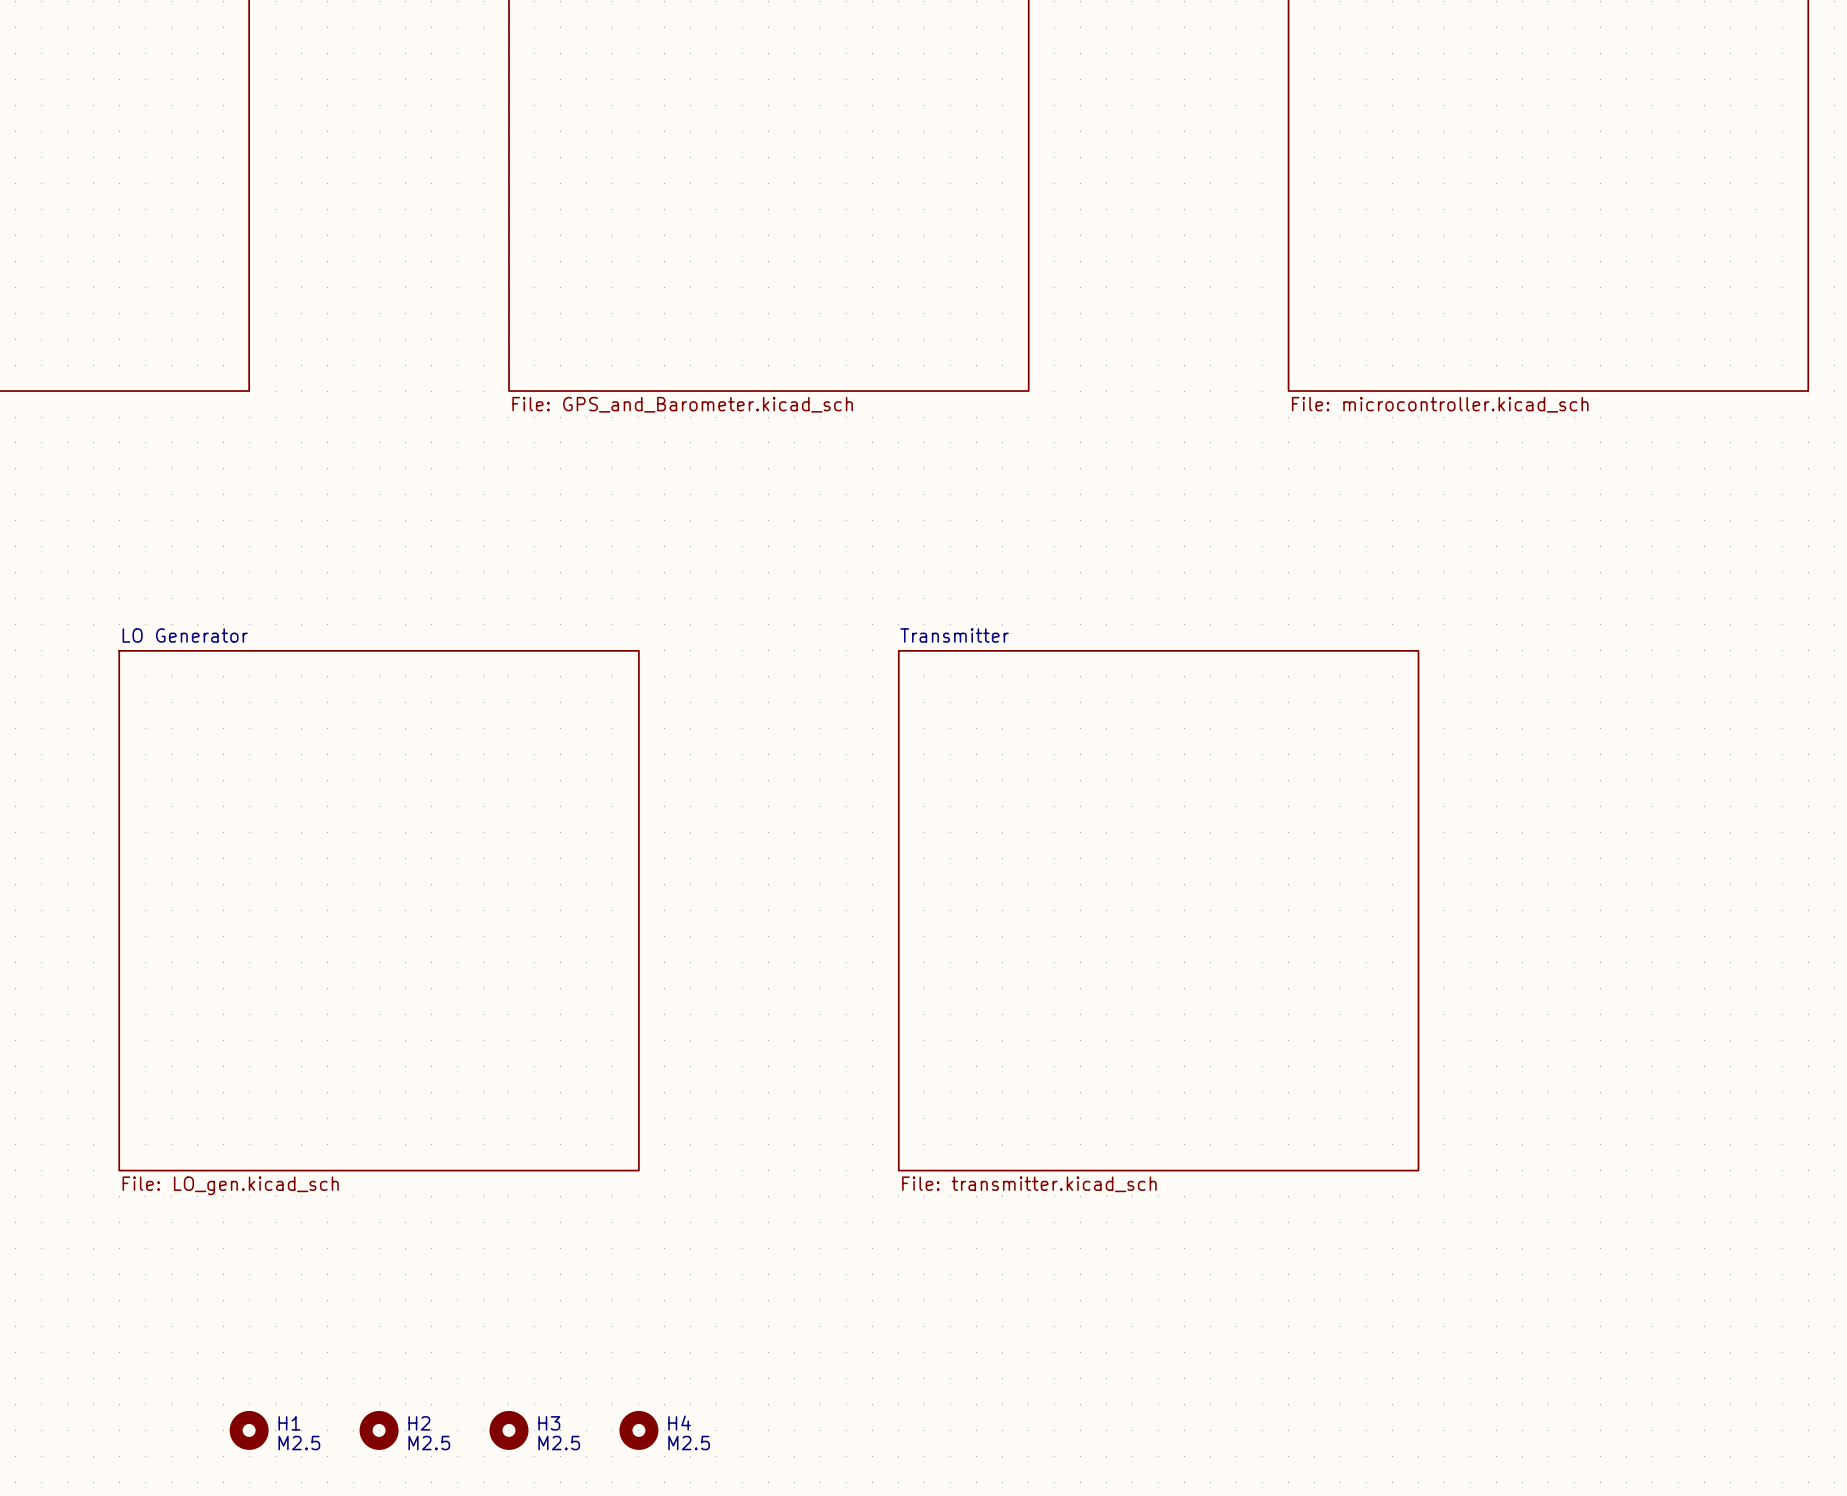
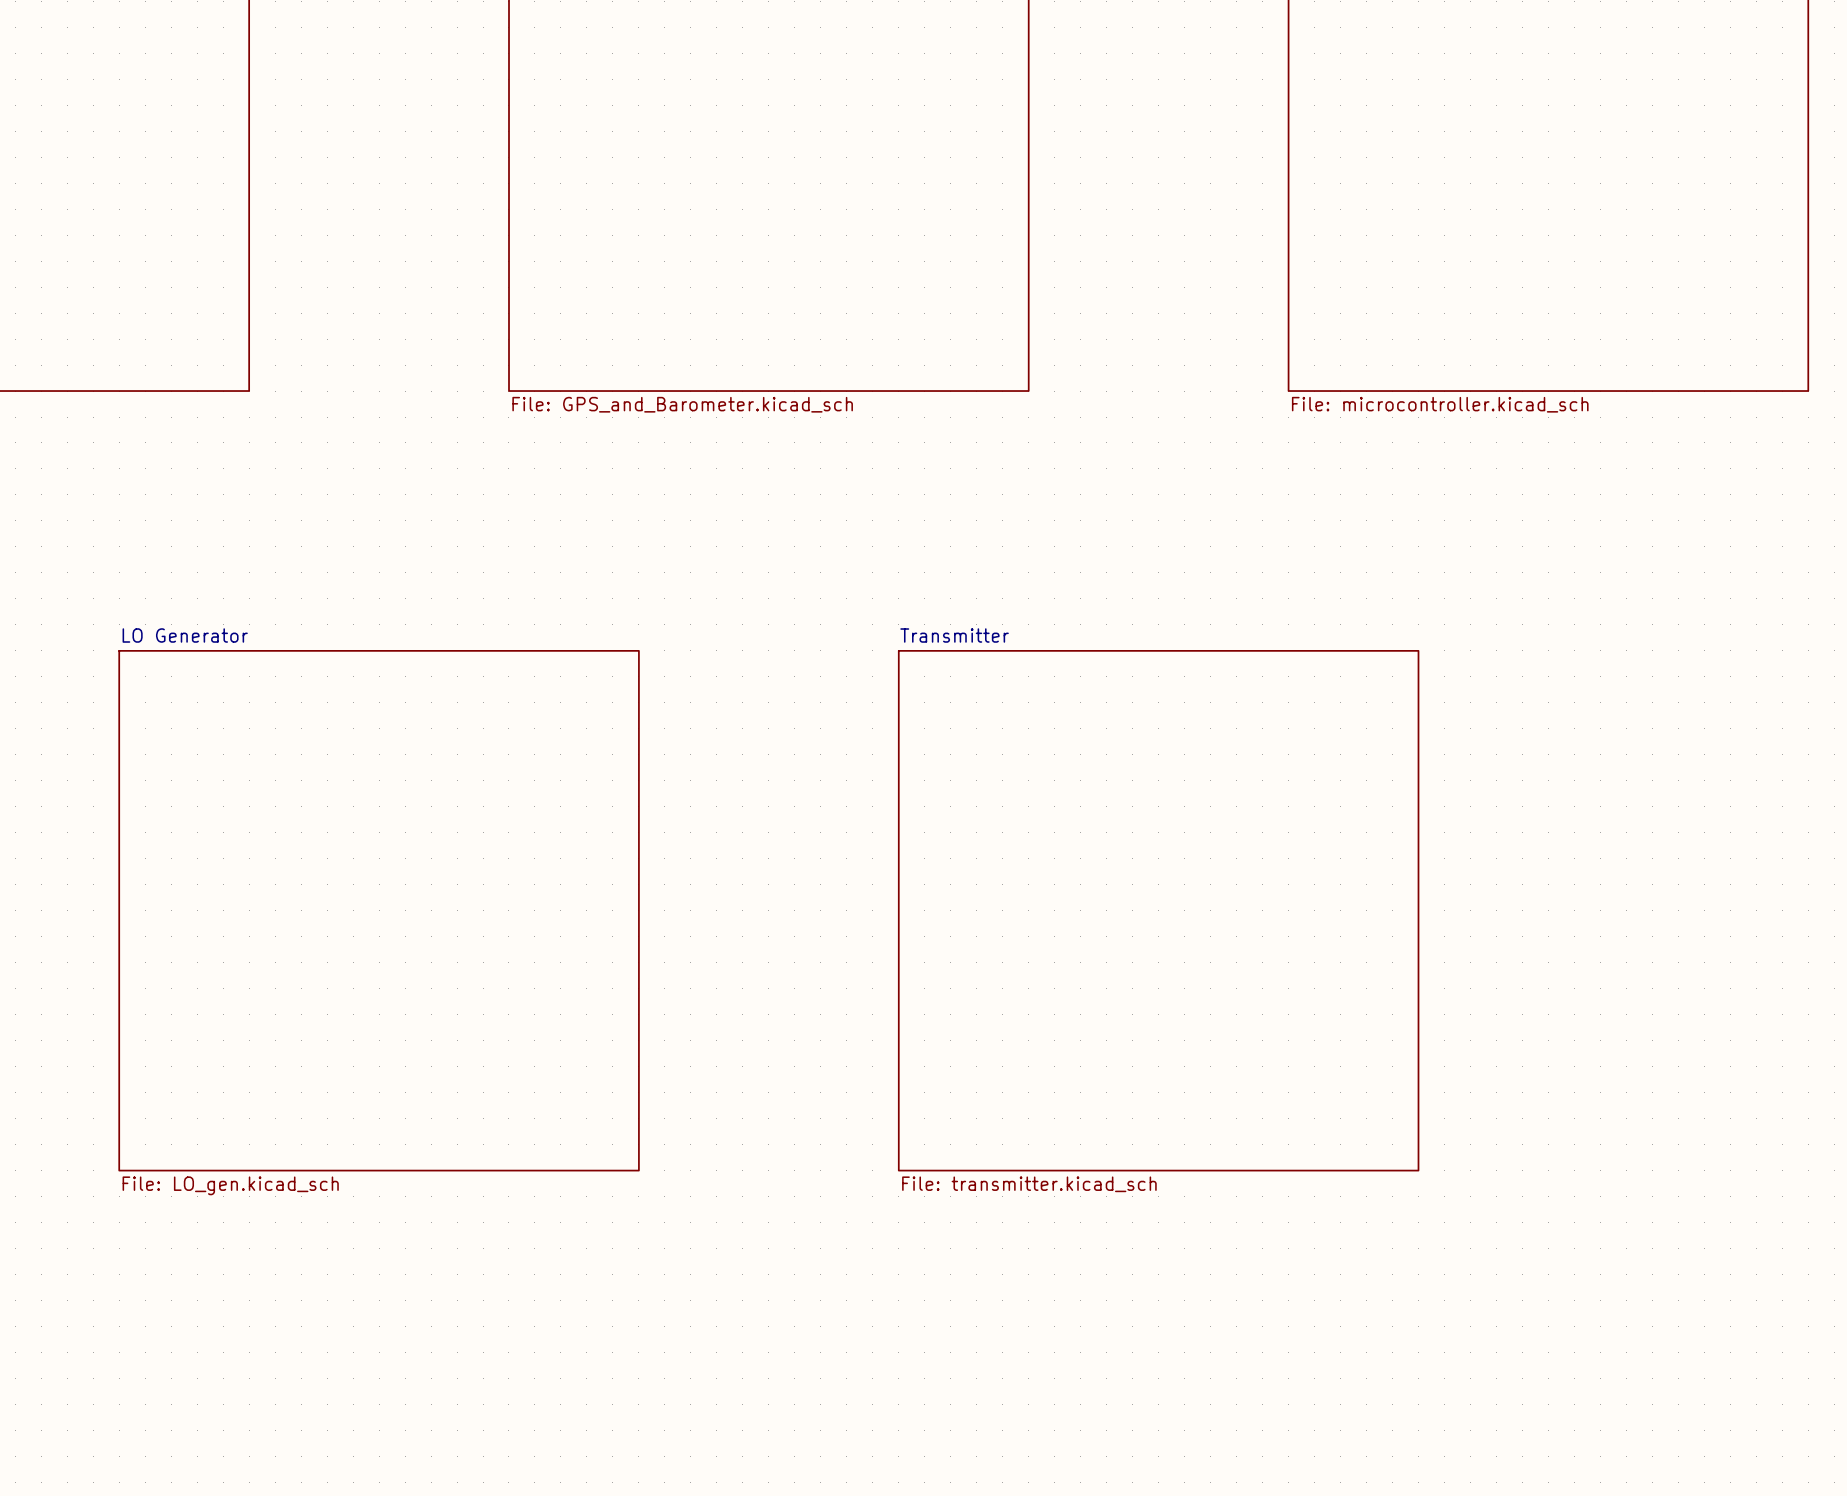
H1: M2.5 (249, 1430) -> none
H2: M2.5 (379, 1430) -> none
H3: M2.5 (508, 1430) -> none
H4: M2.5 (638, 1430) -> none

